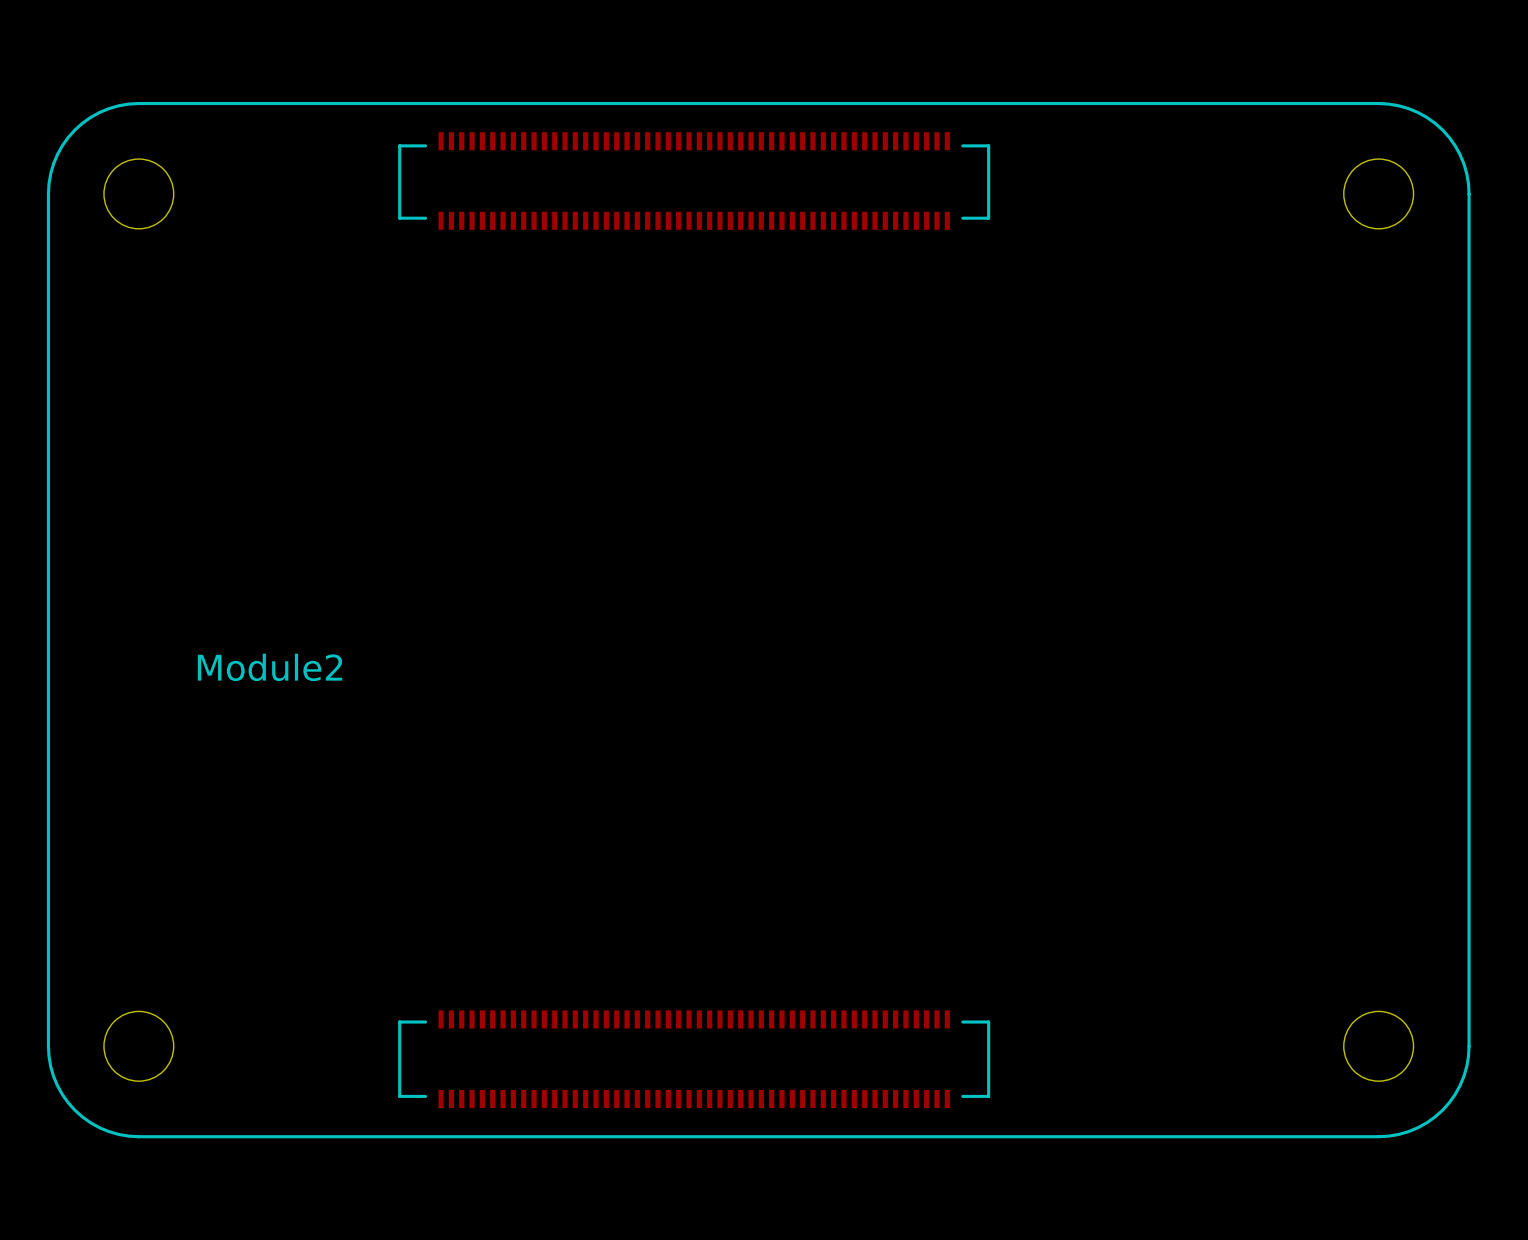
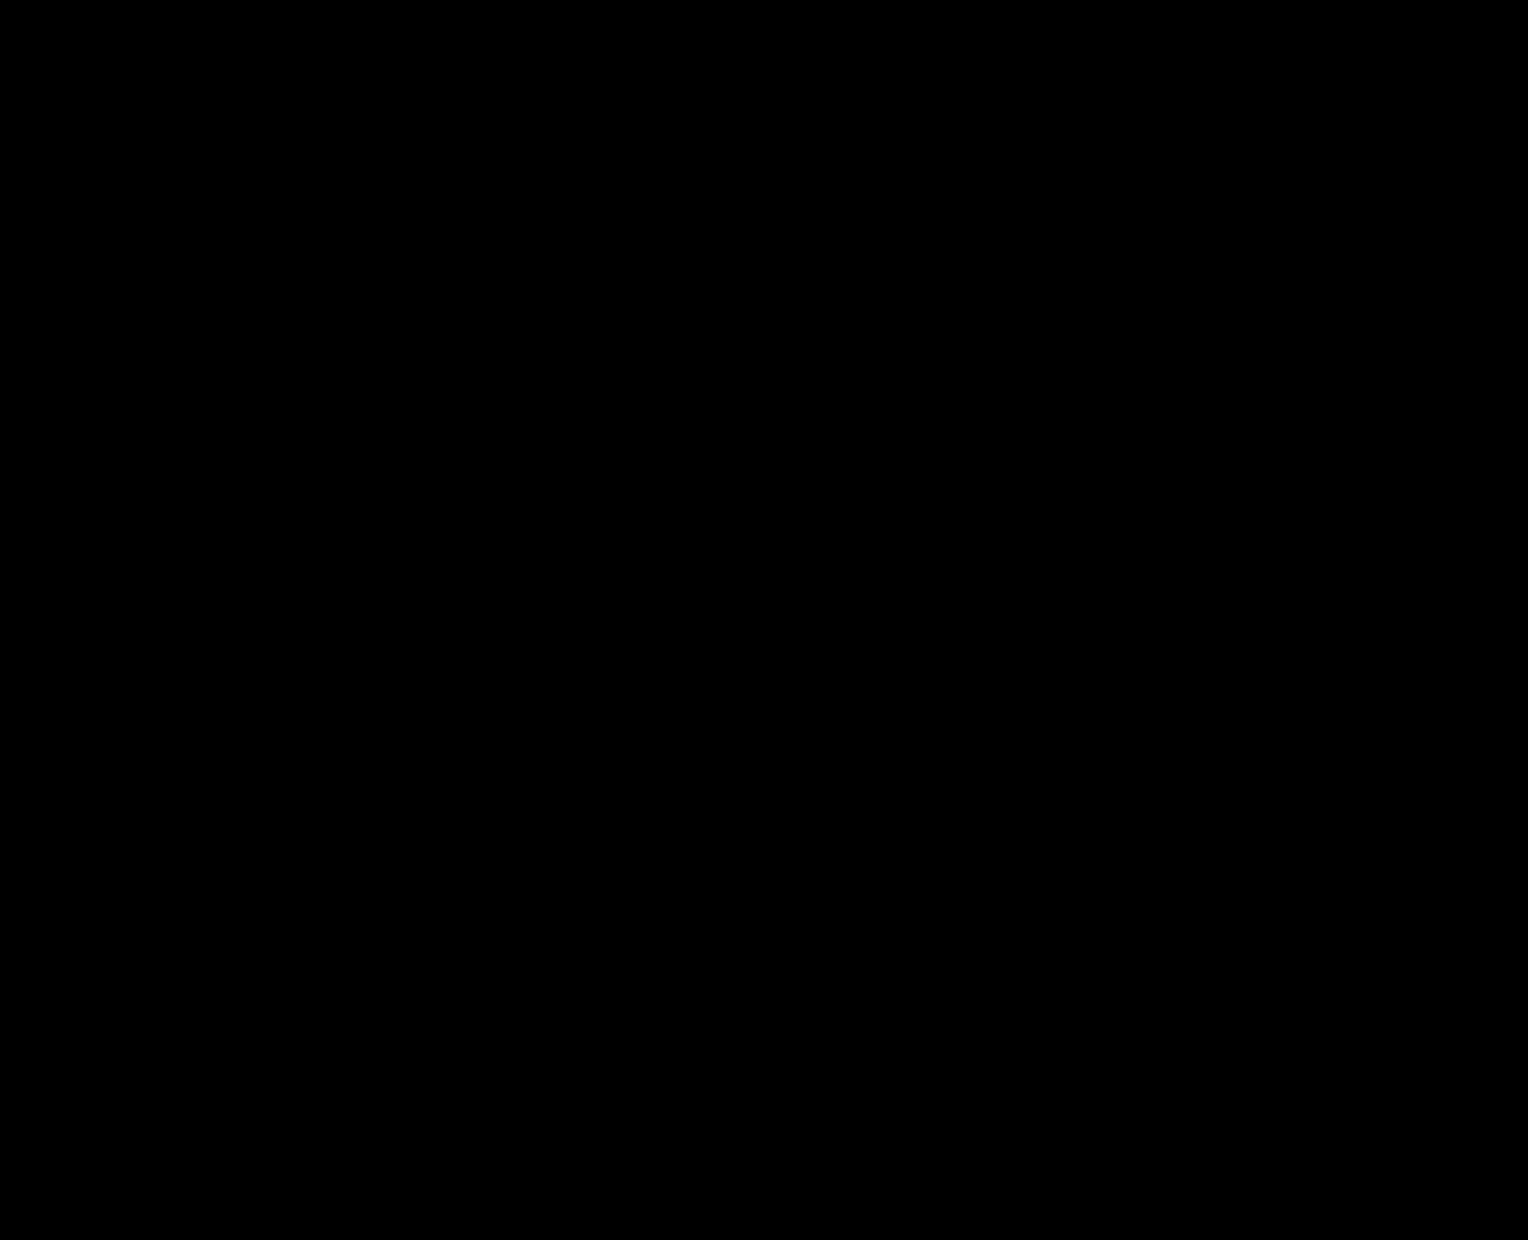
Module2: (758, 620) -> none

